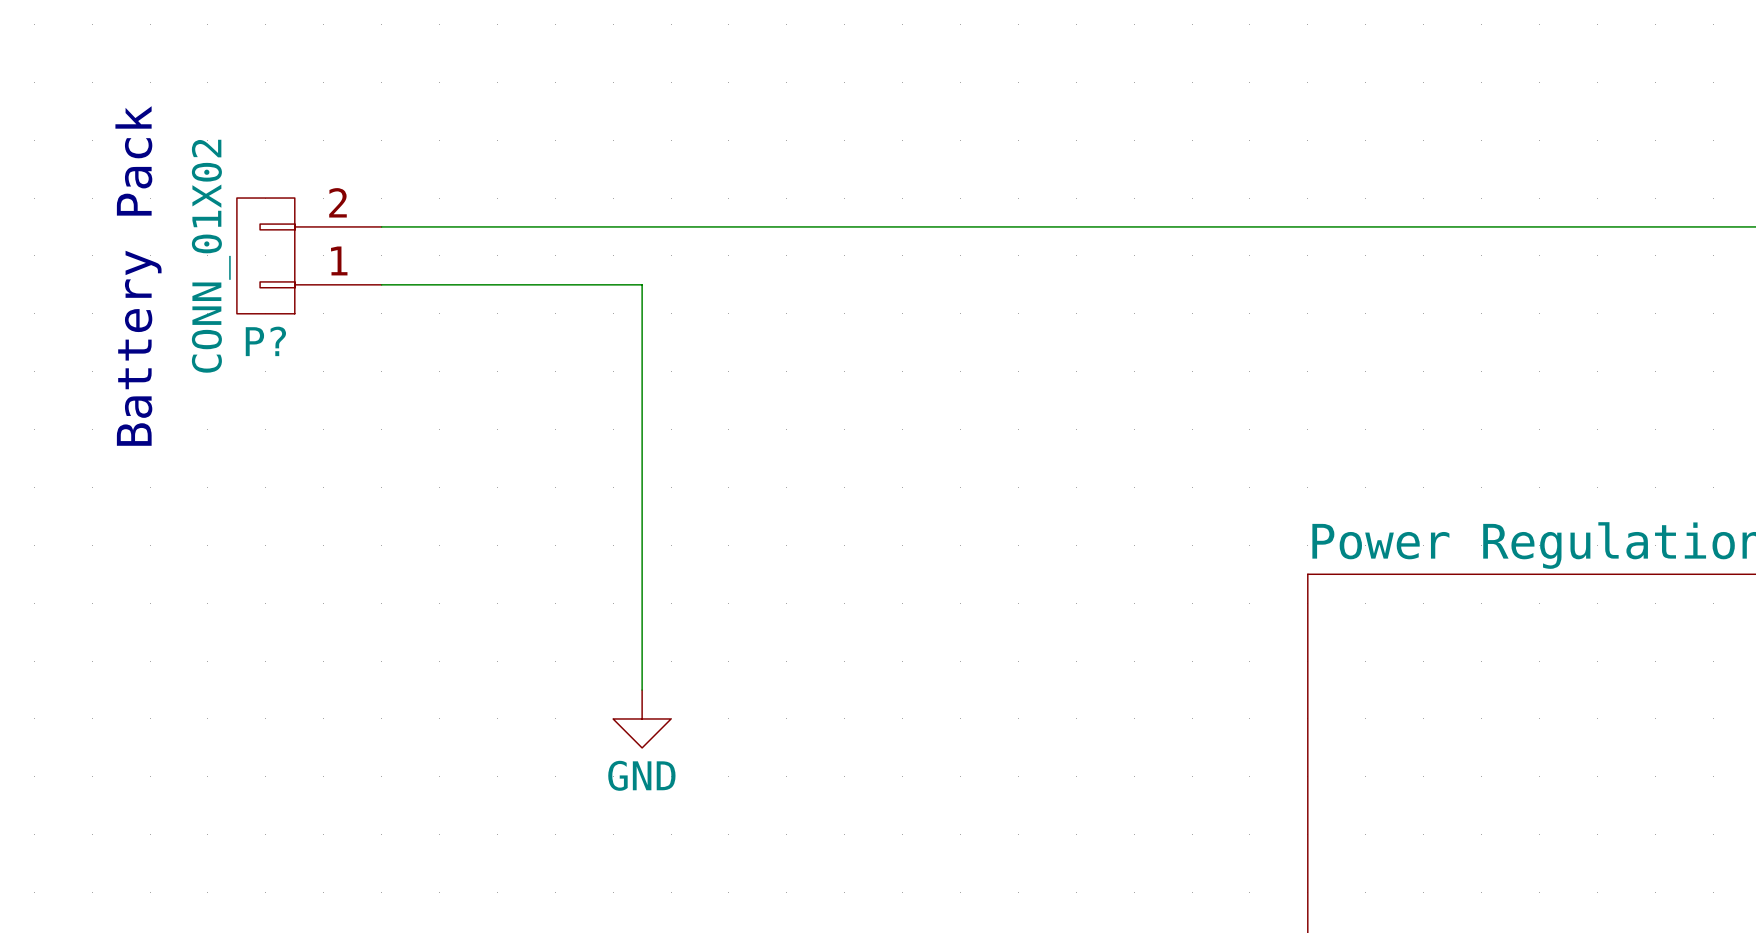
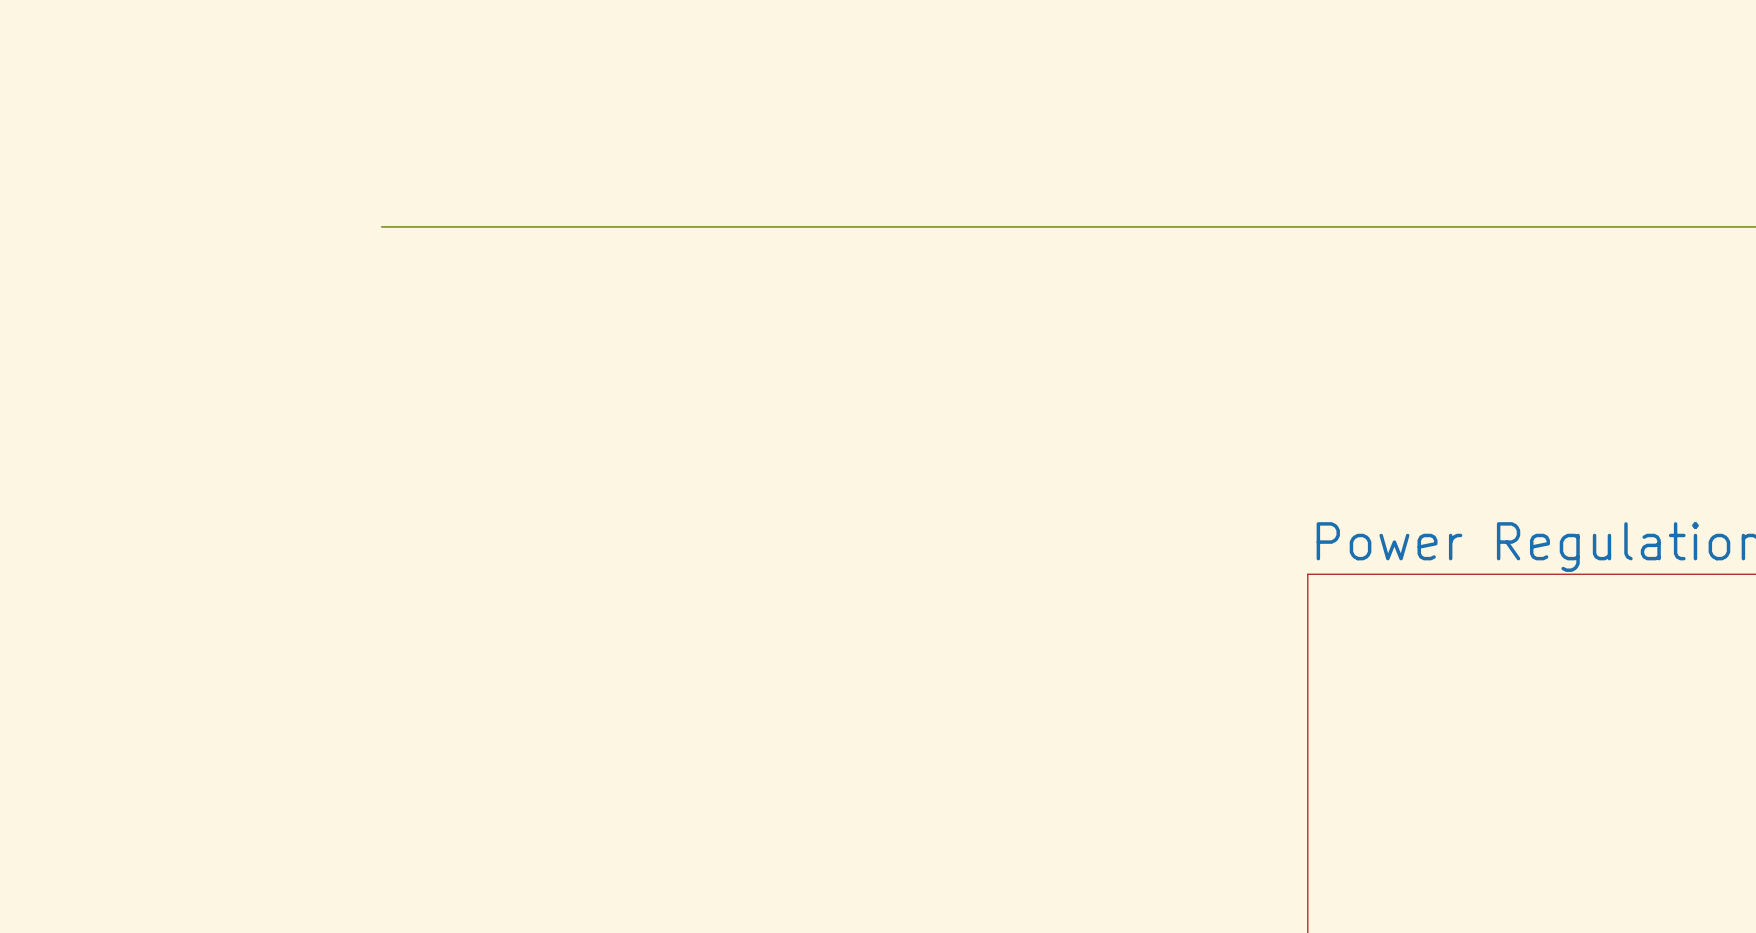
P?: CONN_01X02 (309, 255) -> none
text: Battery Pack (138, 276) -> none
wire: (381, 284) (642, 284) (642, 690) -> none
power symbol: GND (642, 718) -> none

